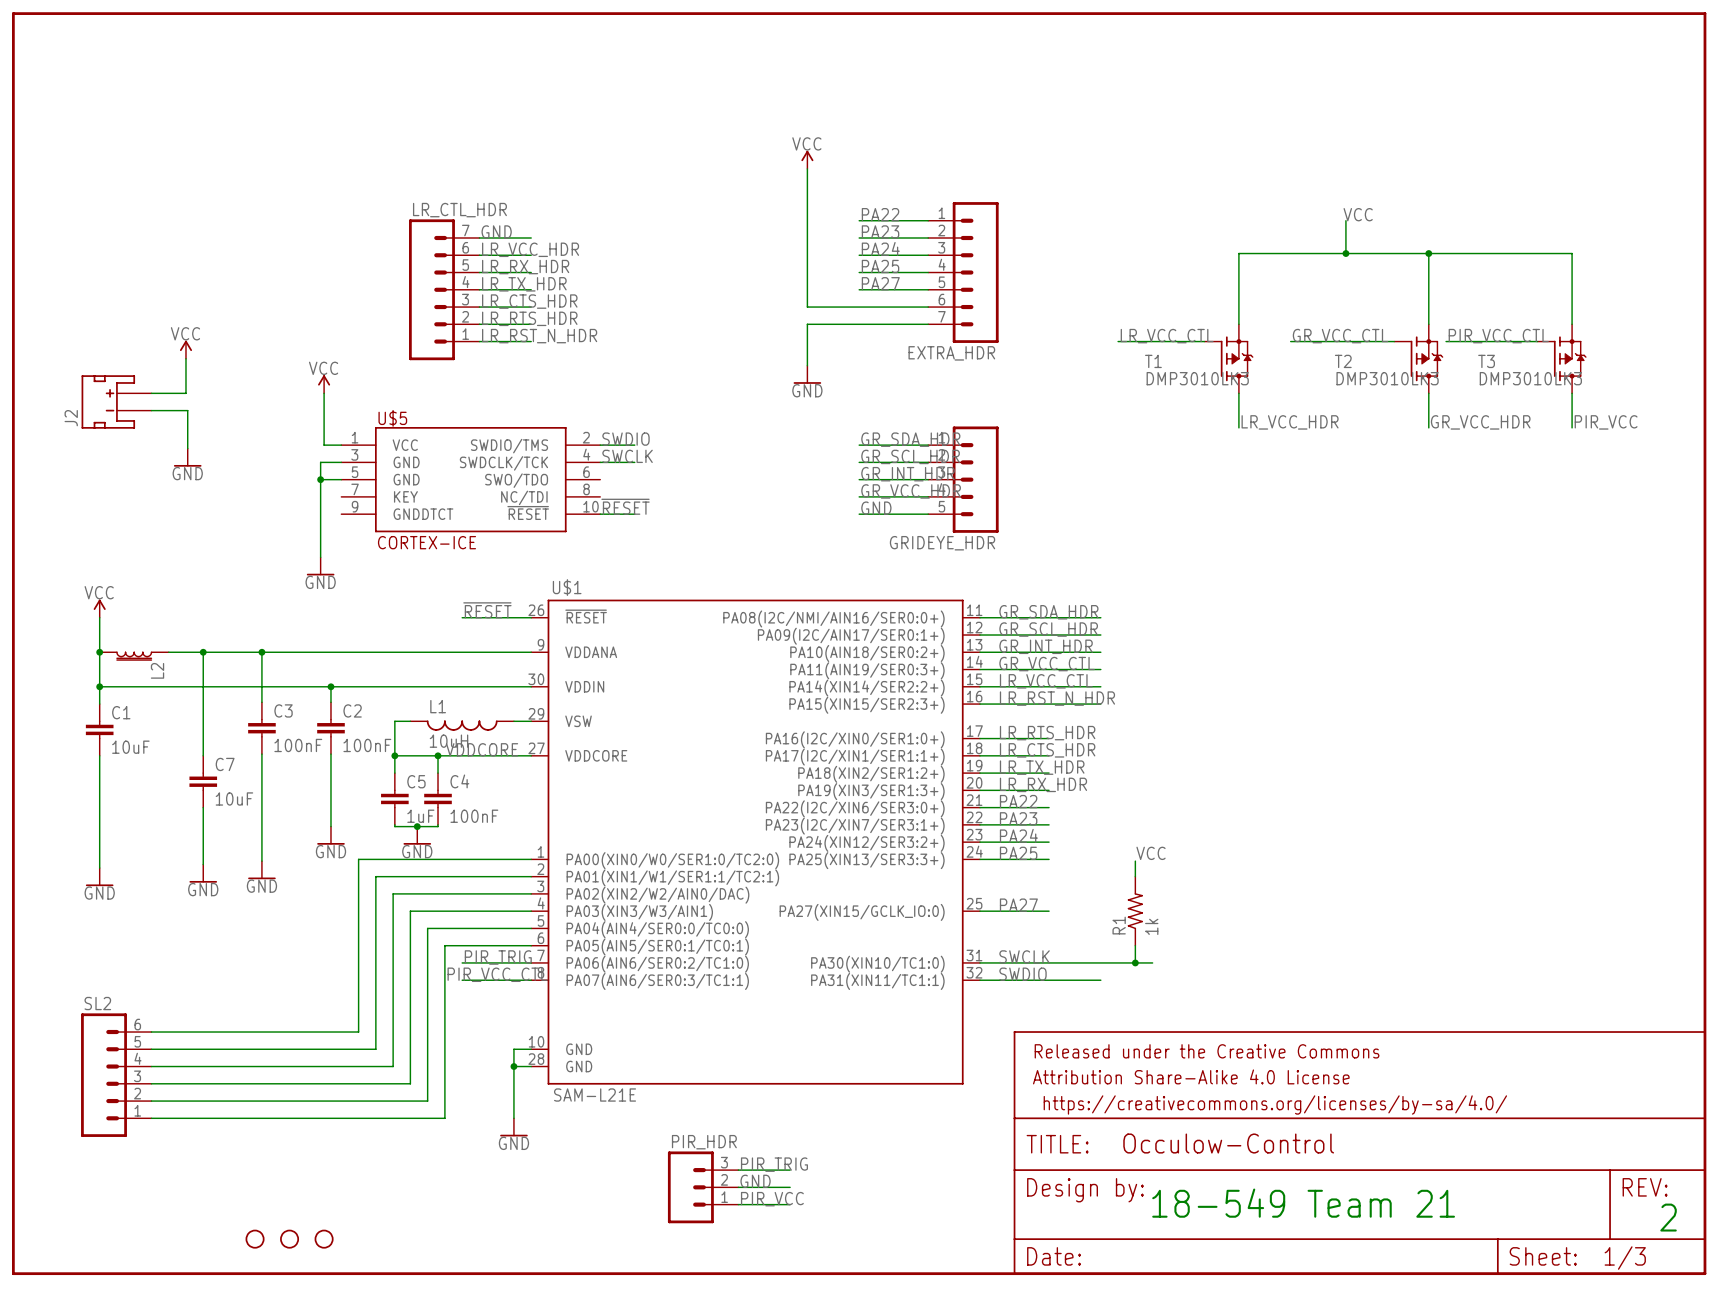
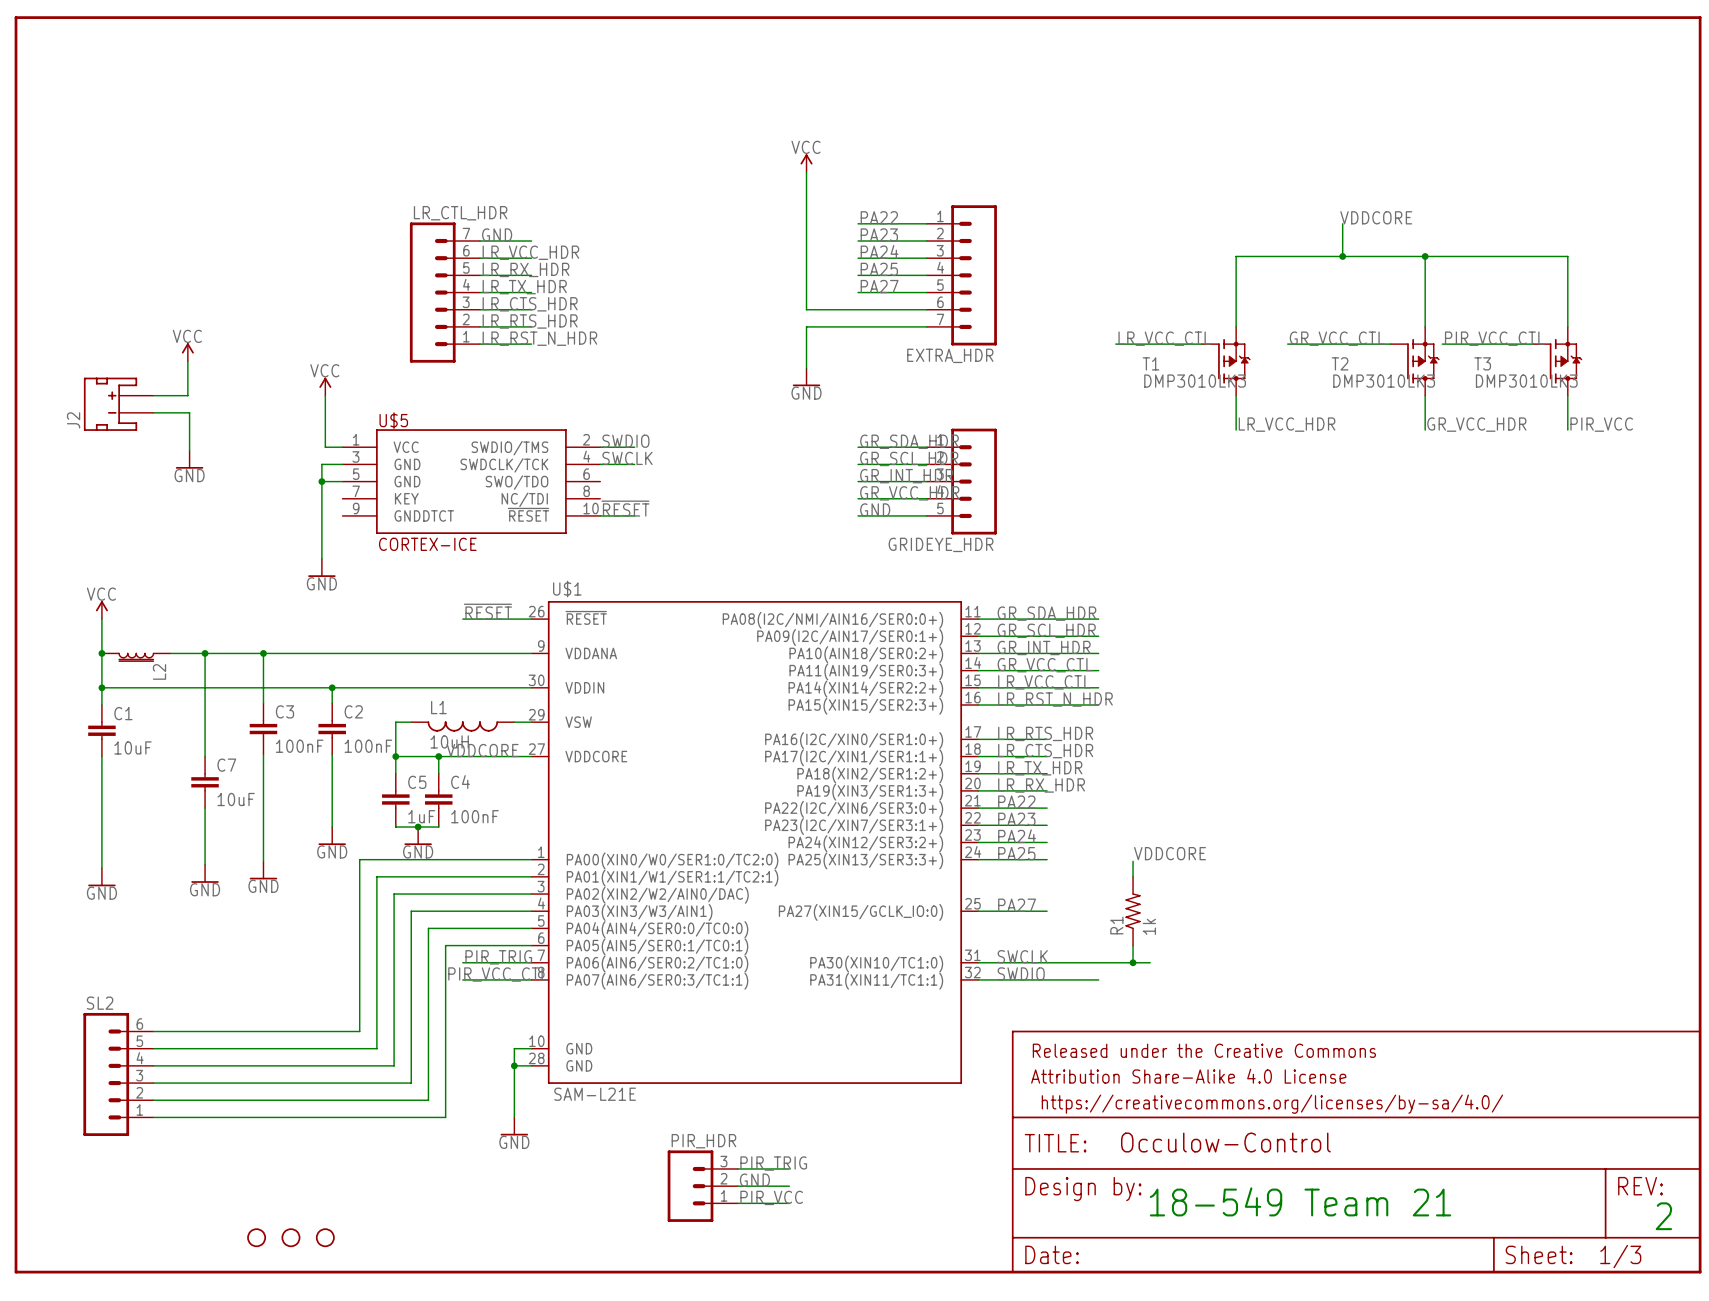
label: VCC (1358, 214) -> VDDCORE (1376, 217)
label: VCC (1151, 853) -> VDDCORE (1170, 853)

